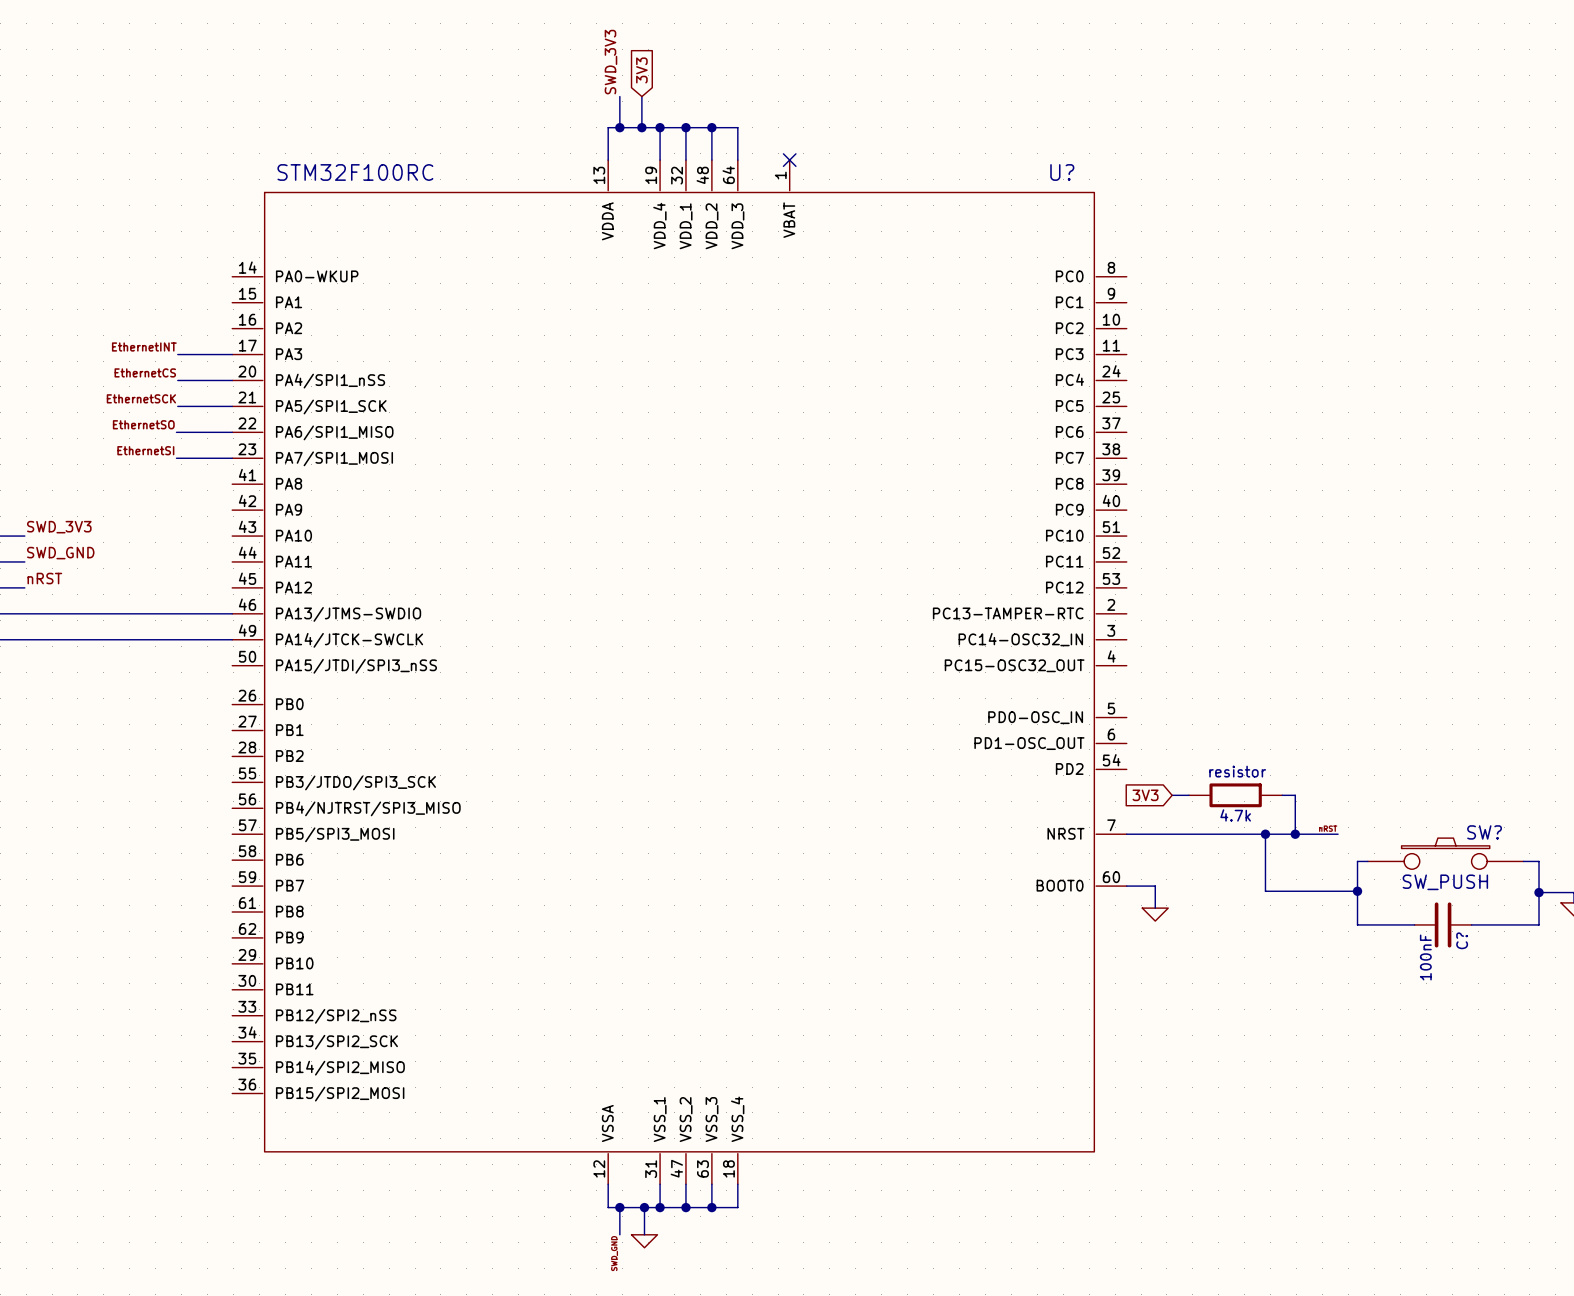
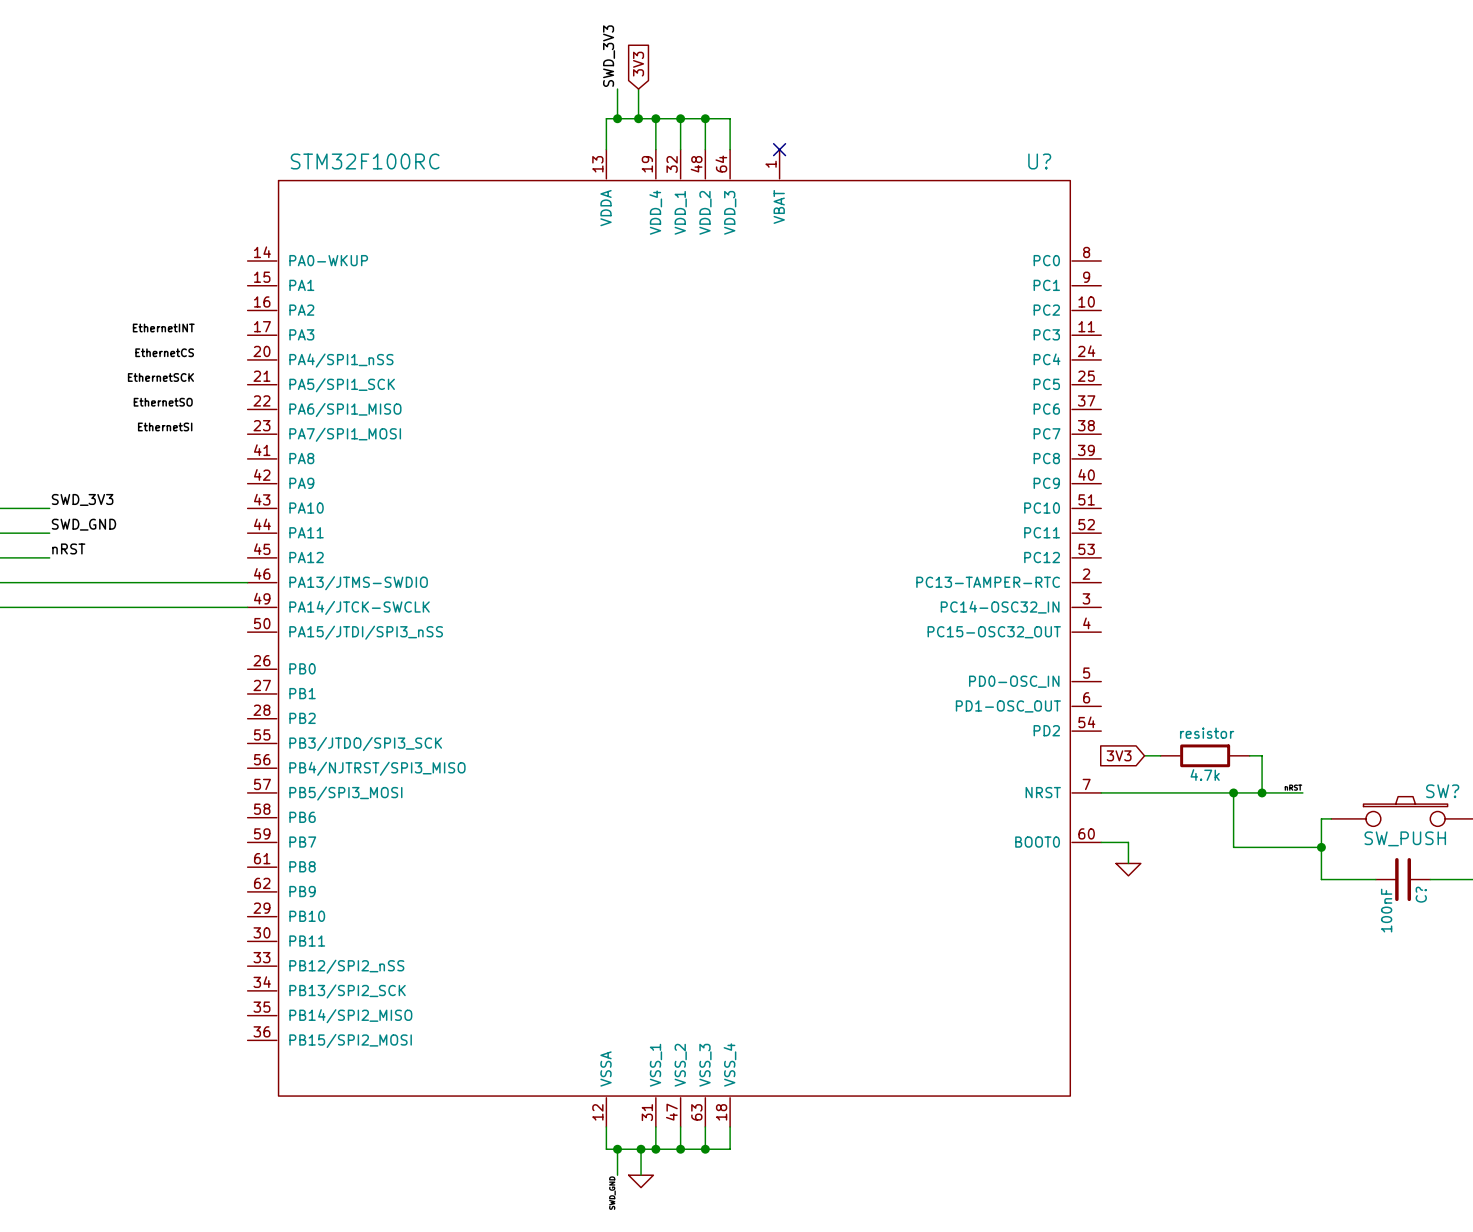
wire: (177, 354) (232, 354) -> none
wire: (177, 380) (232, 380) -> none
wire: (177, 406) (232, 406) -> none
wire: (176, 432) (232, 432) -> none
wire: (176, 458) (232, 458) -> none

